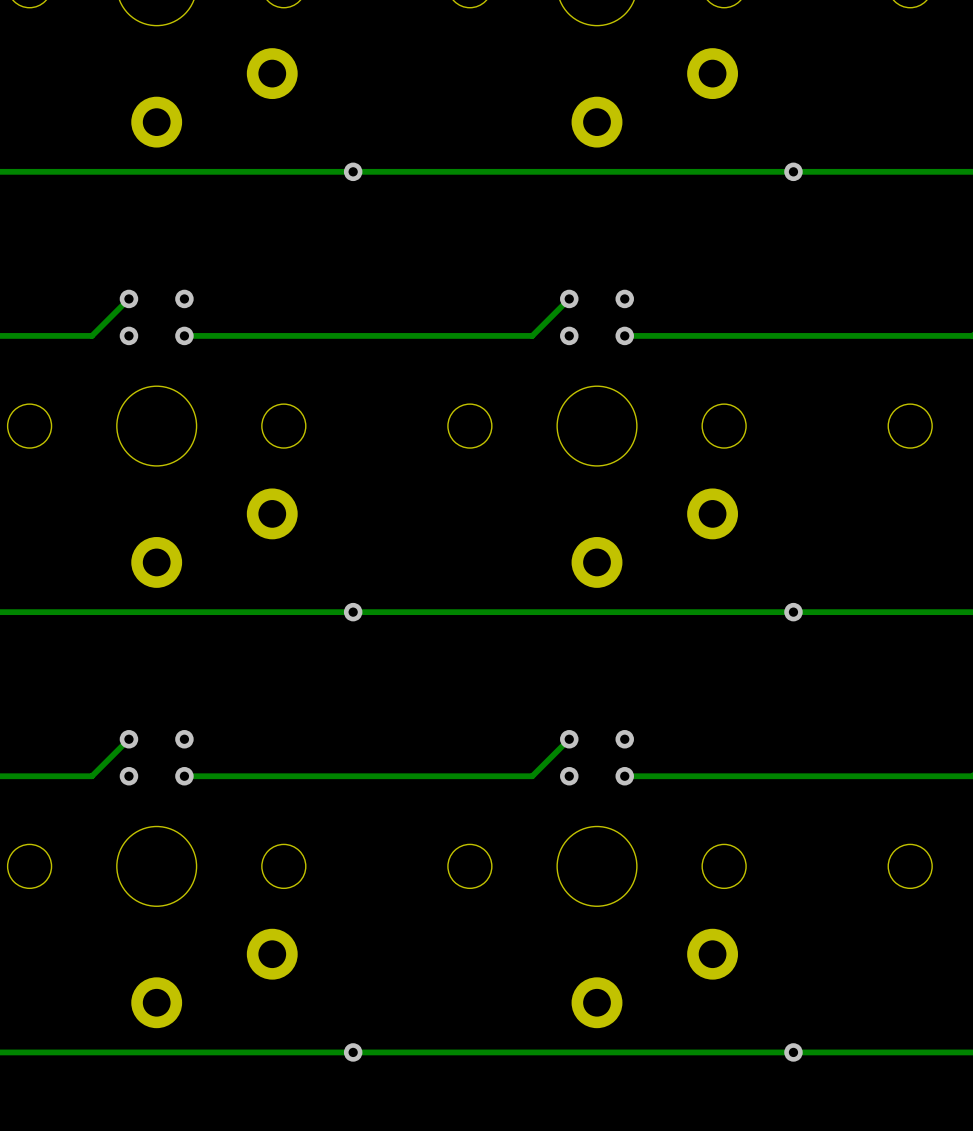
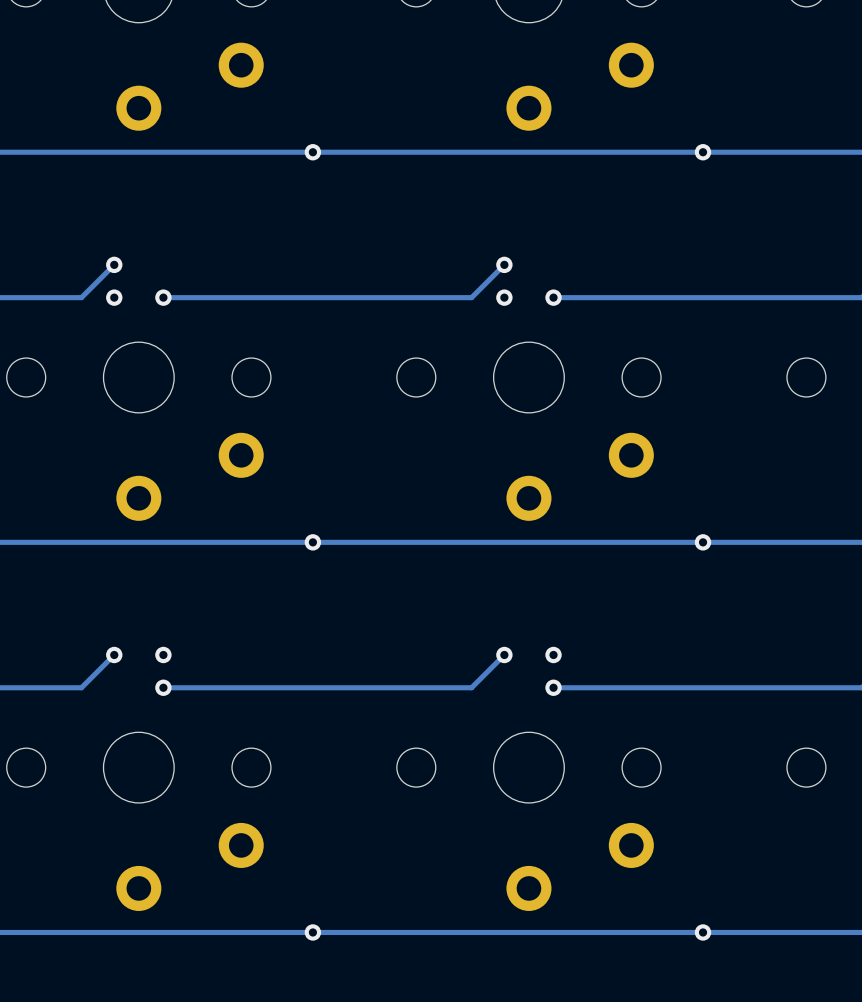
via: (184, 298) -> none
via: (624, 298) -> none
via: (128, 776) -> none
via: (569, 776) -> none

